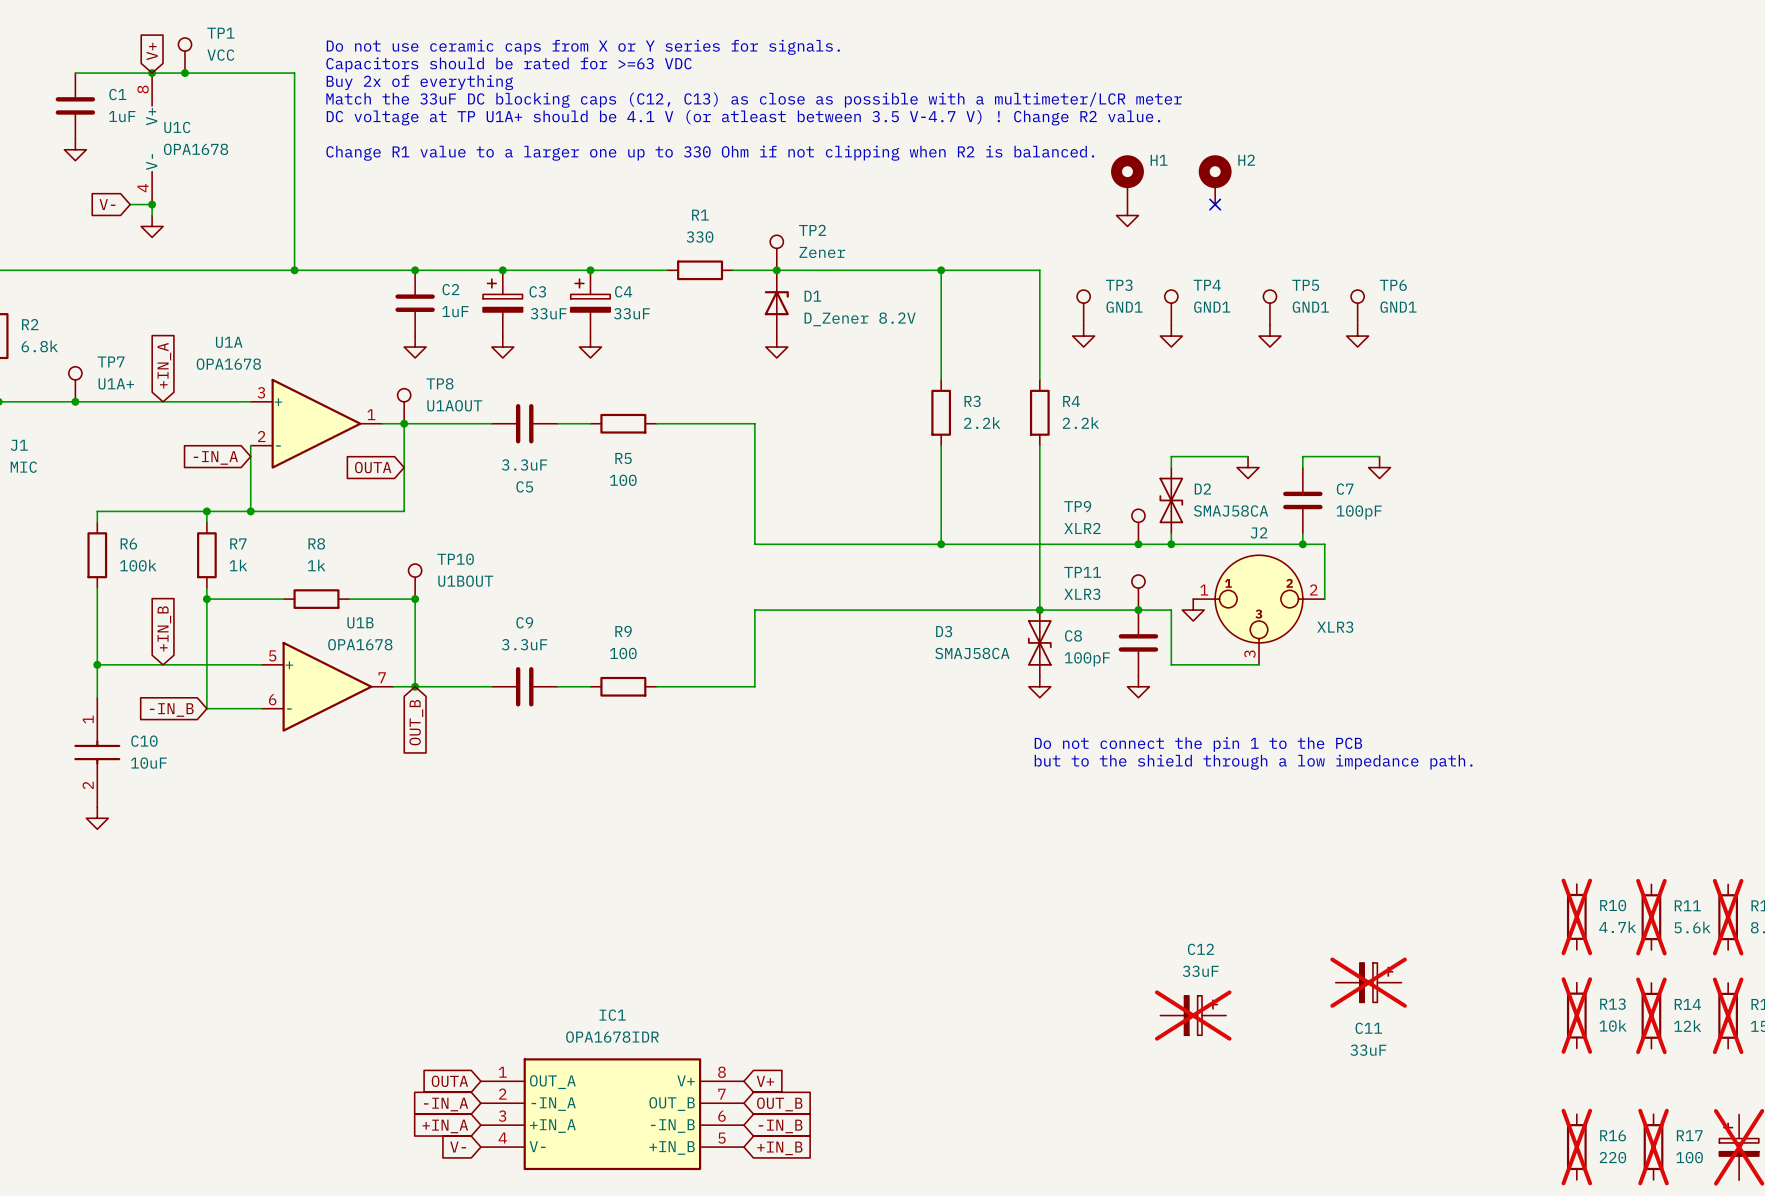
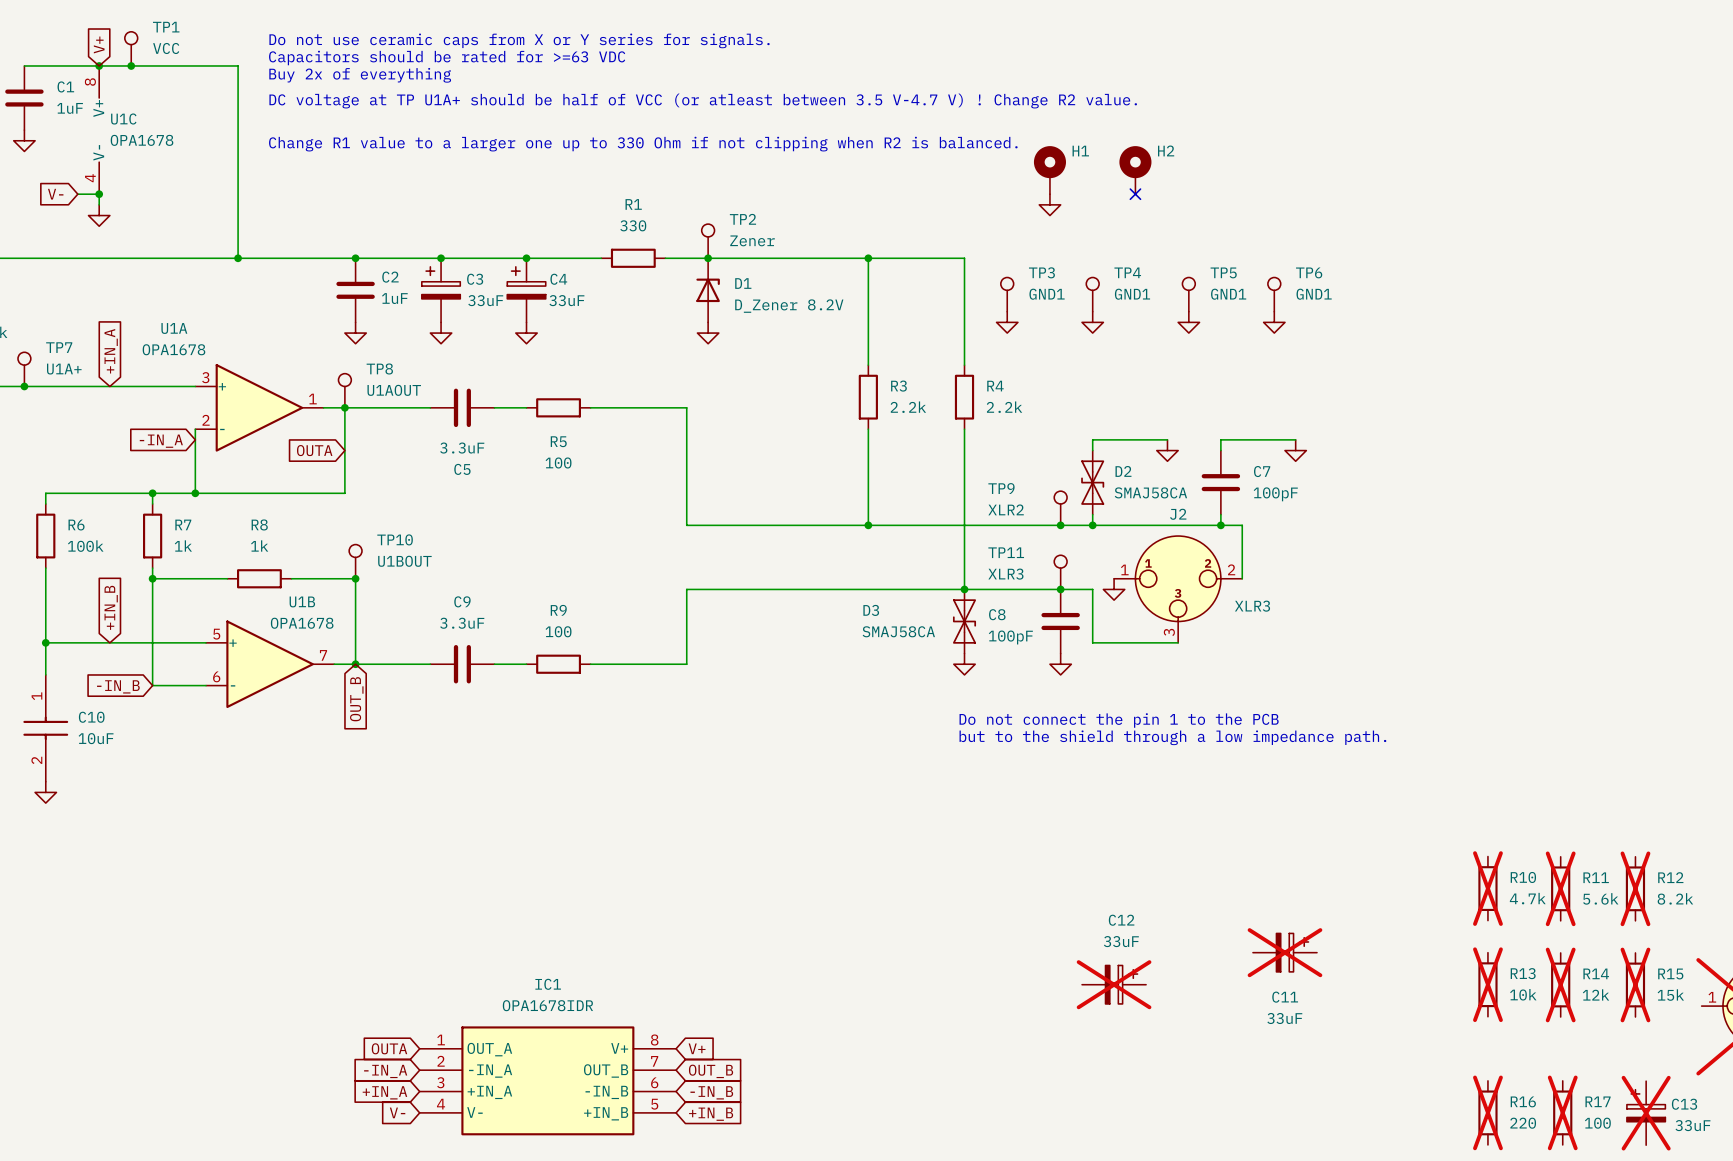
text: Match the 33uF DC blocking caps (C12, C13) as close as possible with a multimeter/LCR meter (754, 100) -> none
text: DC voltage at TP U1A+ should be 4.1 V (or atleast between 3.5 V-4.7 V) ! Change R2 value. (743, 117) -> DC voltage at TP U1A+ should be half of VCC (or atleast between 3.5 V-4.7 V) ! Change R2 value. (703, 101)

